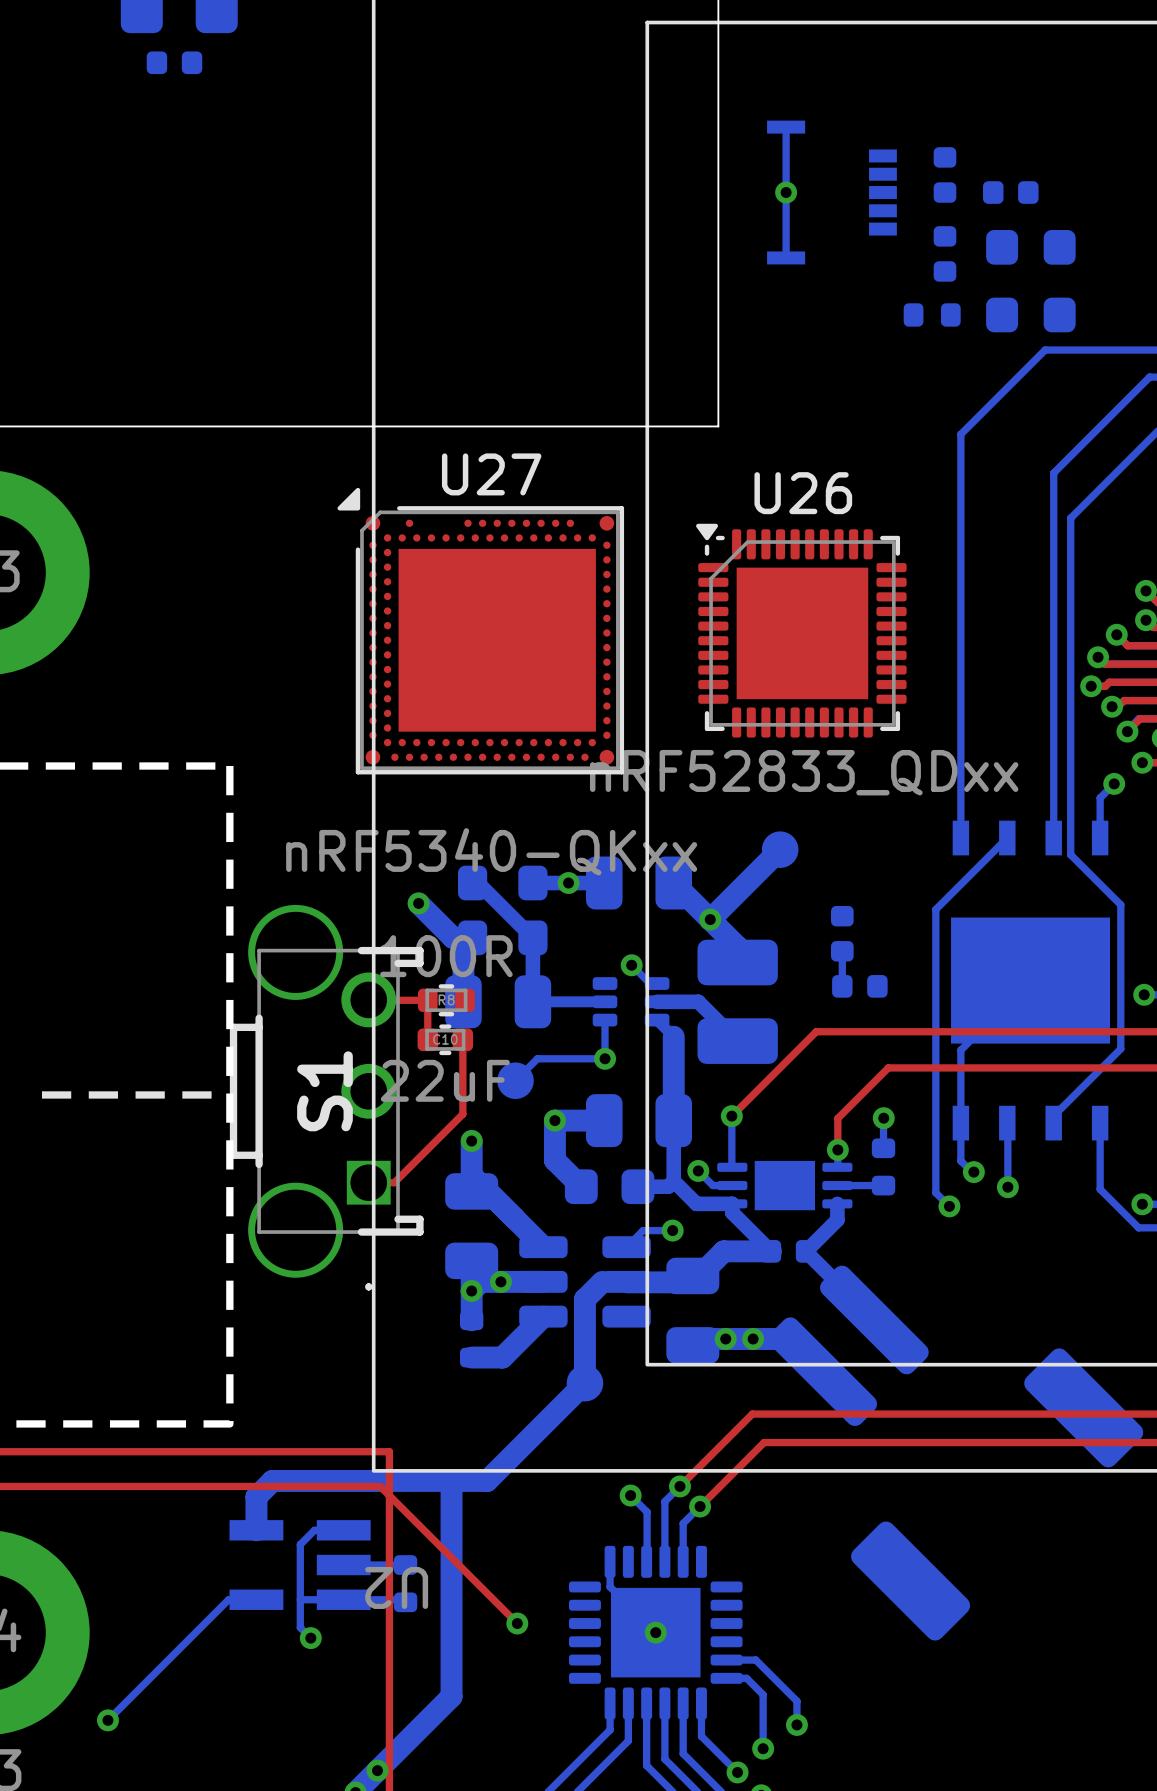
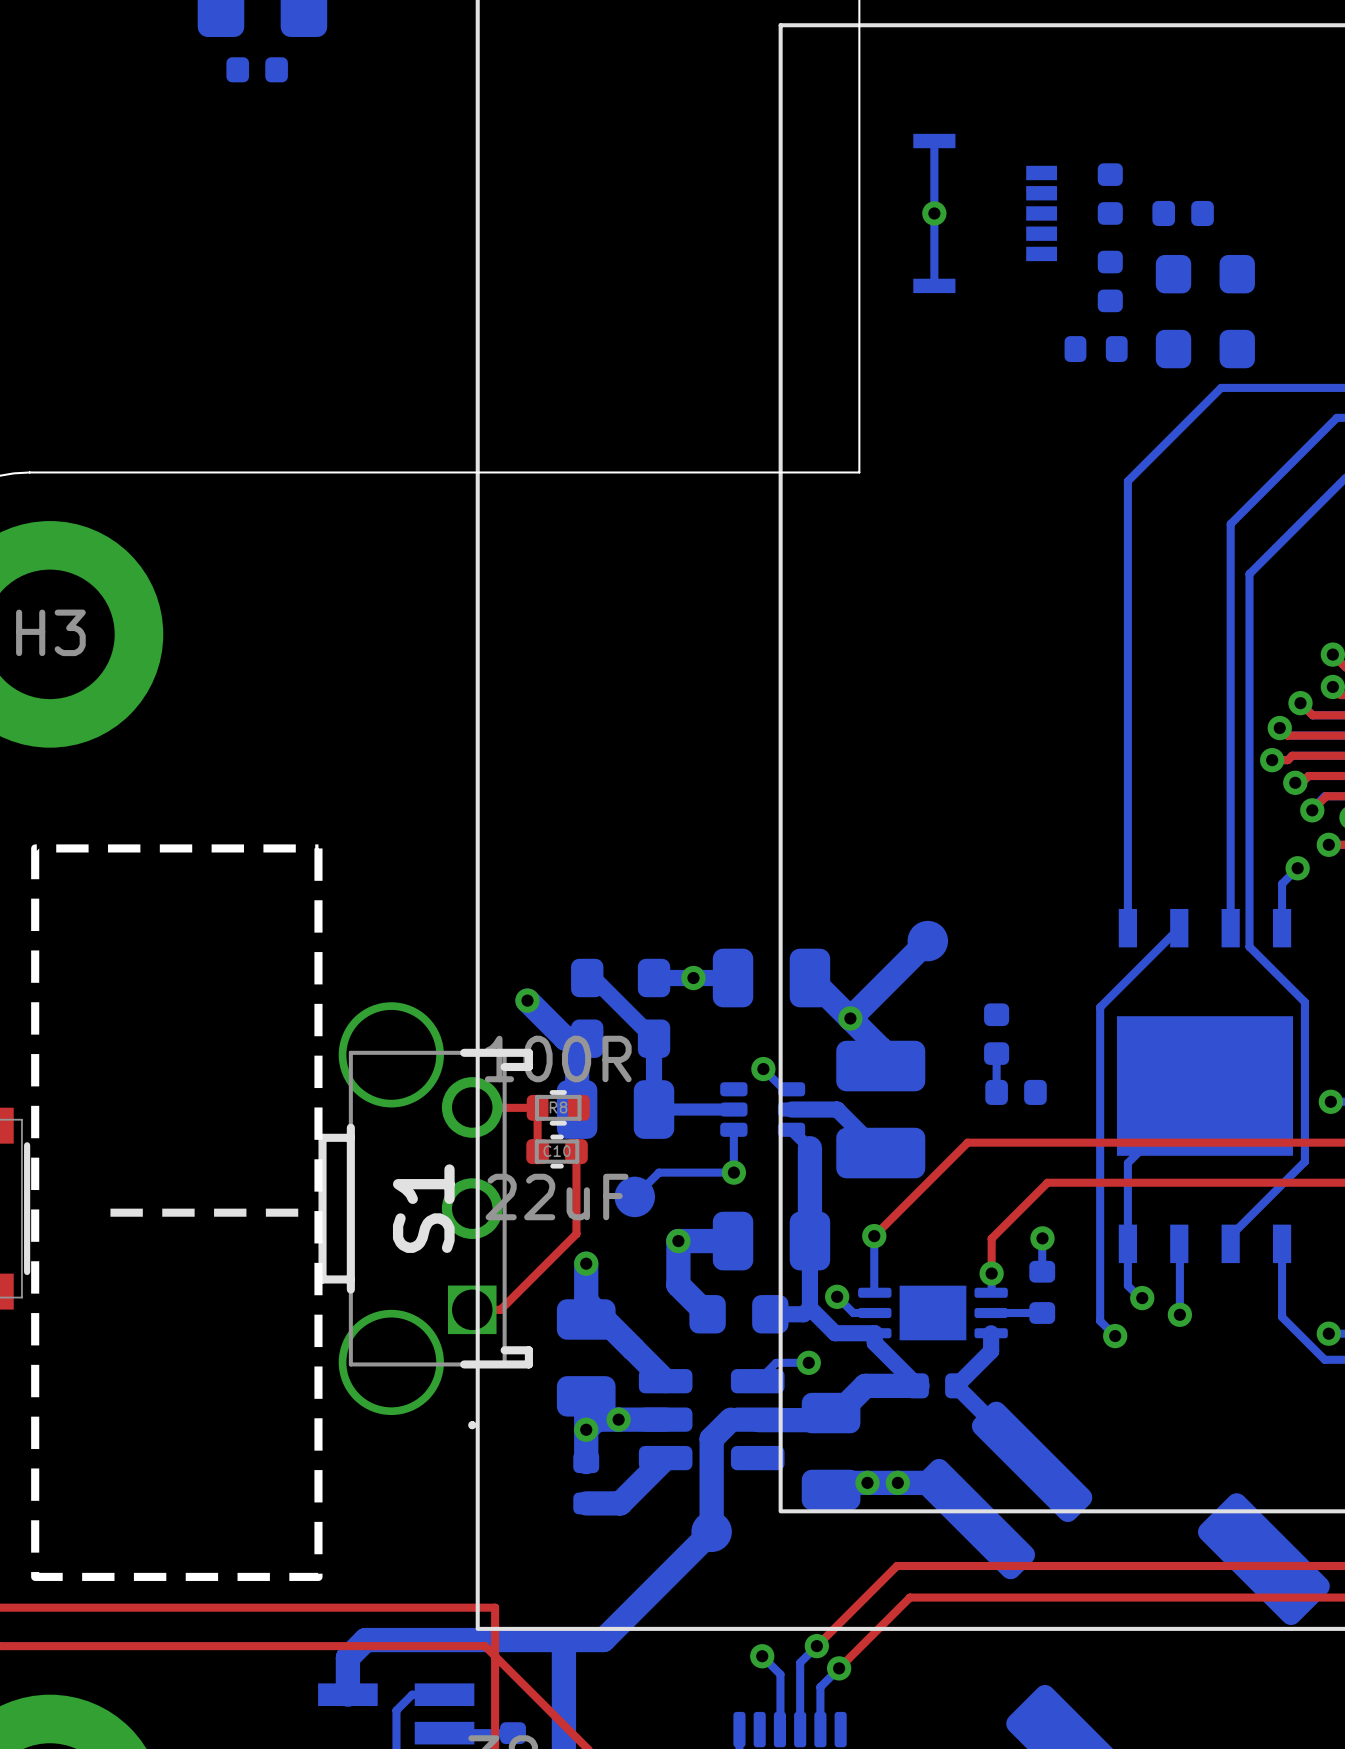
U26: nRF52833_QDxx (801, 630) -> none
U27: nRF5340-QKxx (480, 631) -> none

